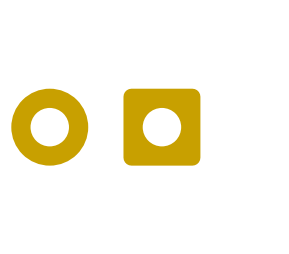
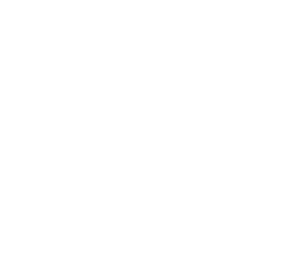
part: (105, 127) -> none

